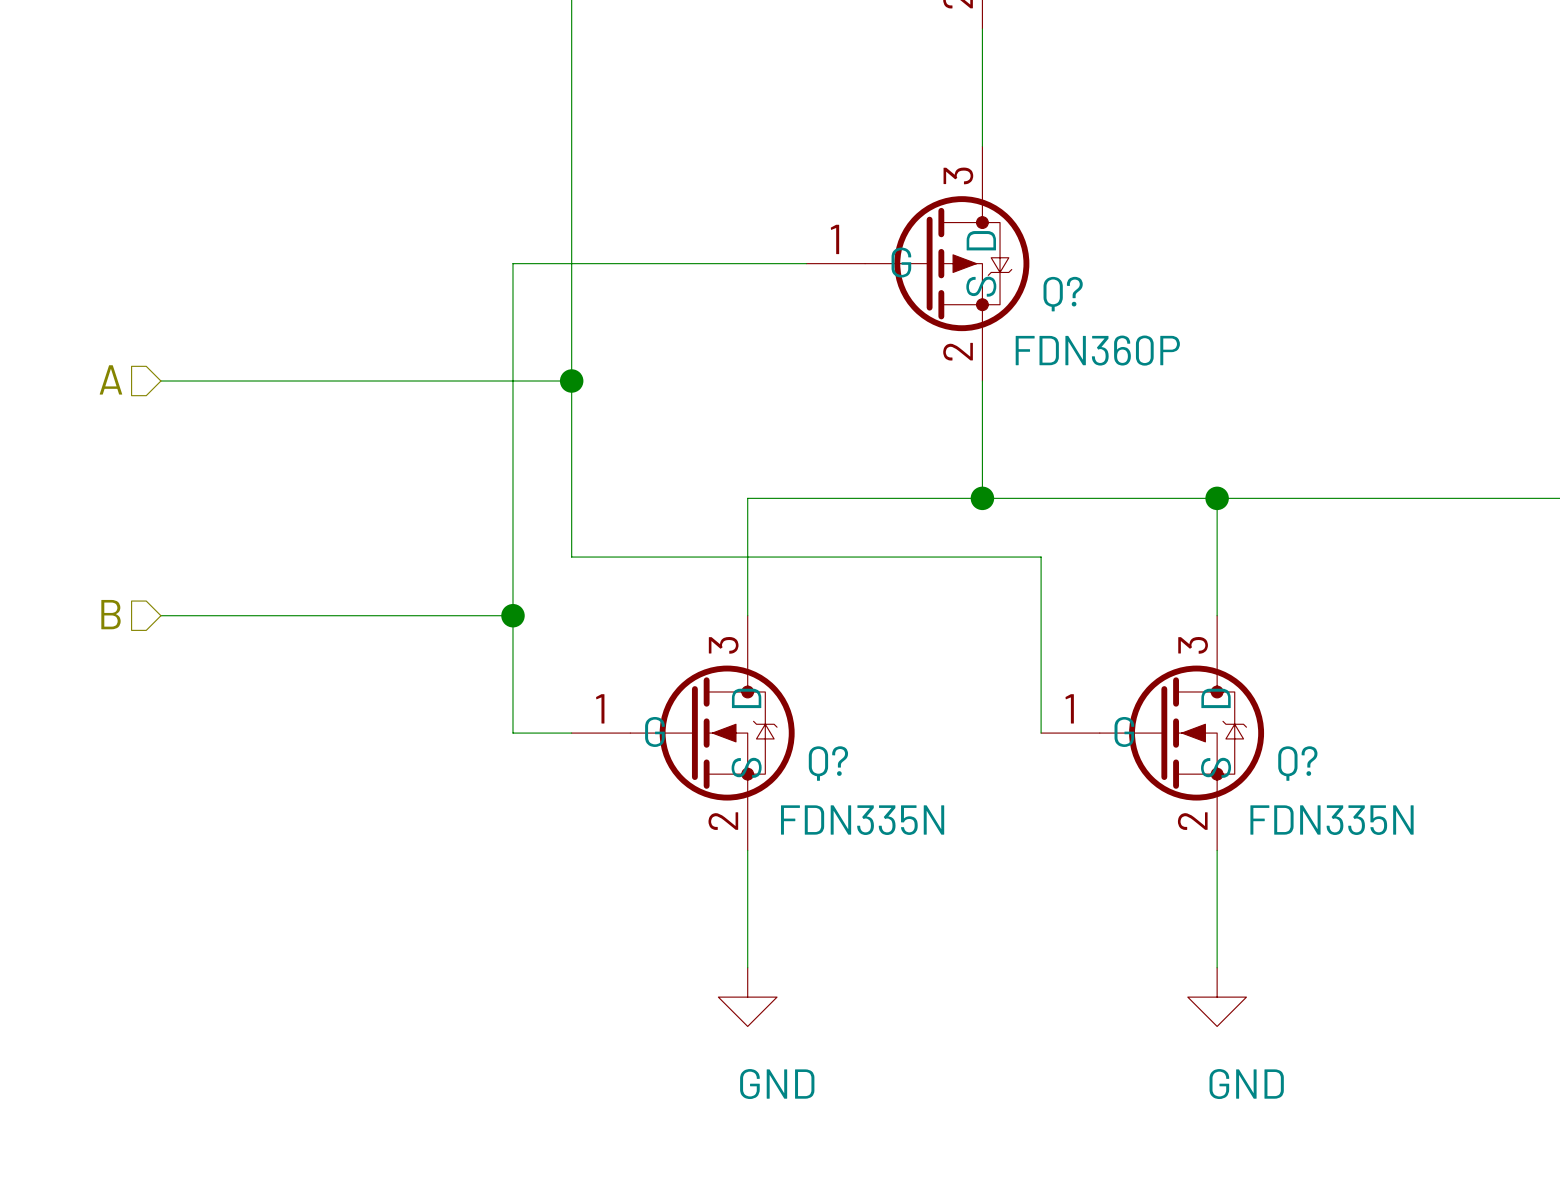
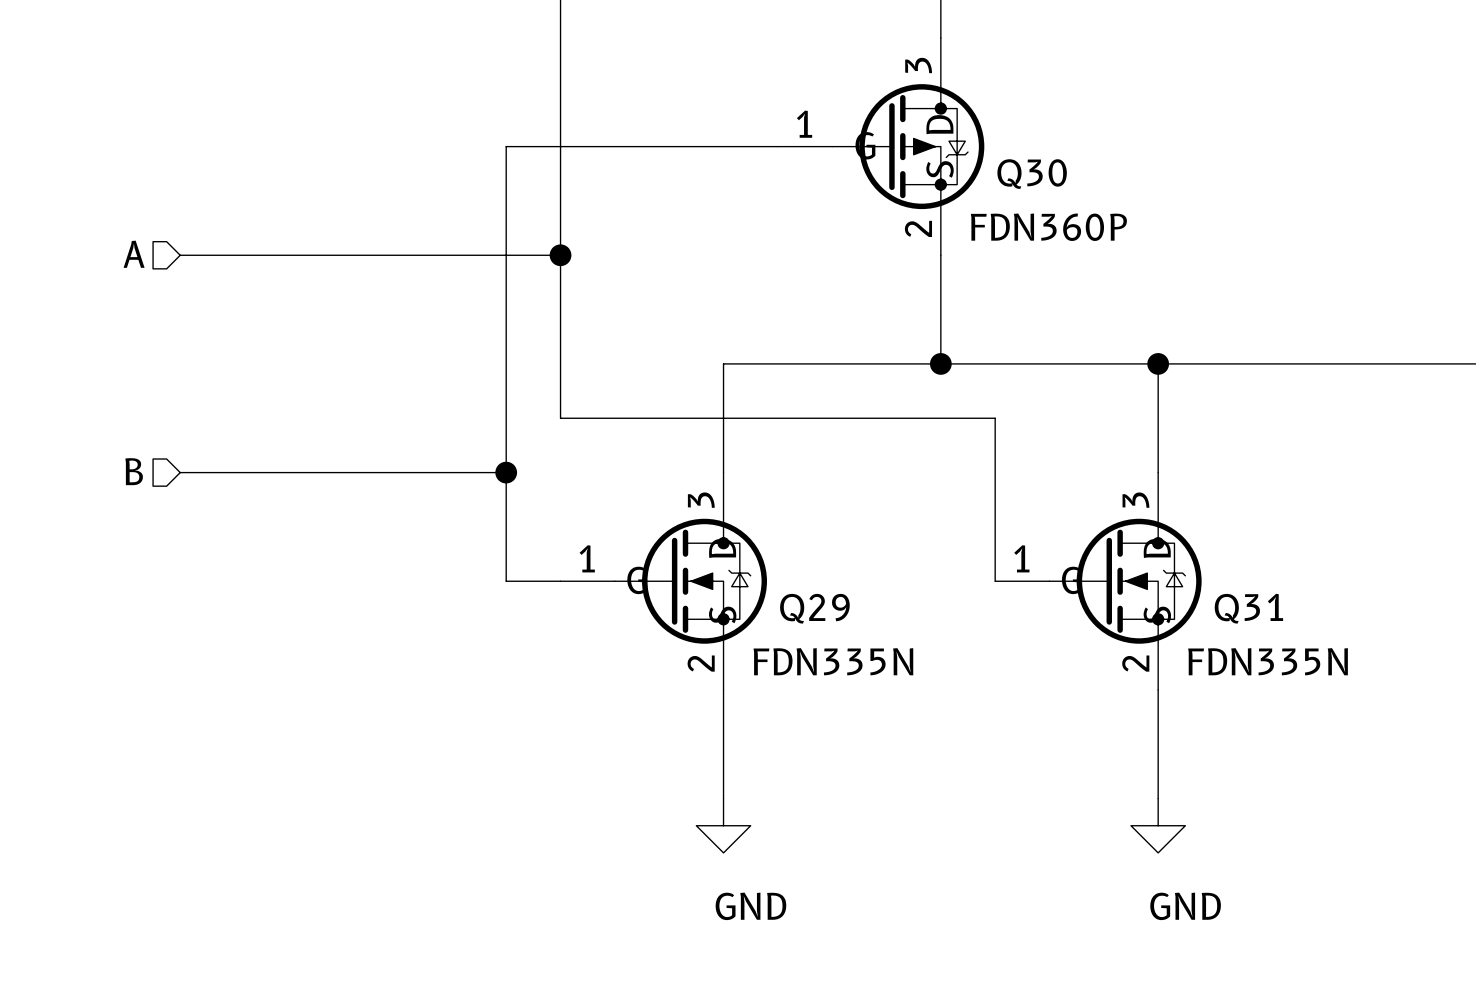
Q? name: Q? (1063, 294) -> Q30 (1032, 174)
Q? name: Q? (828, 763) -> Q29 (814, 608)
Q? name: Q? (1297, 763) -> Q31 (1248, 608)

